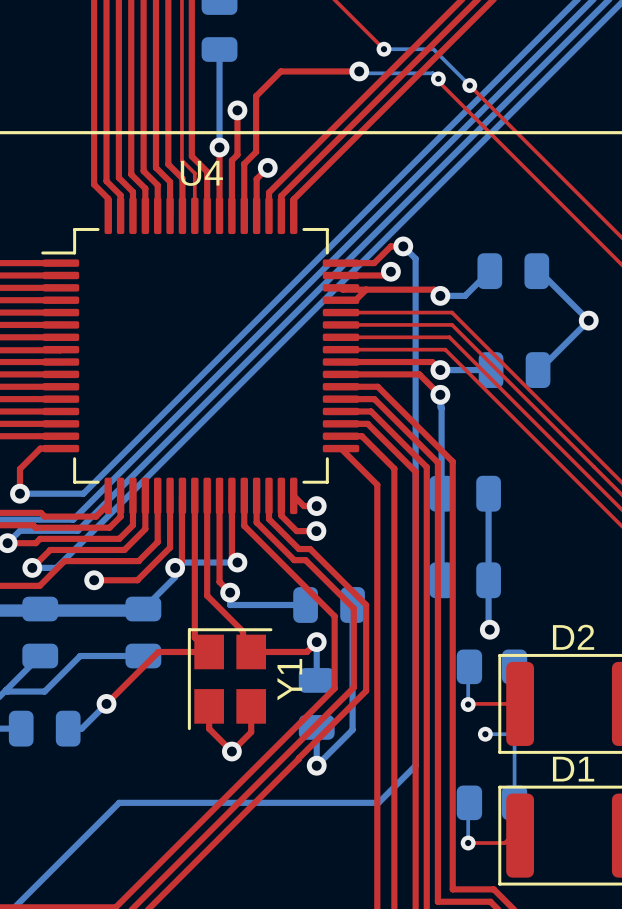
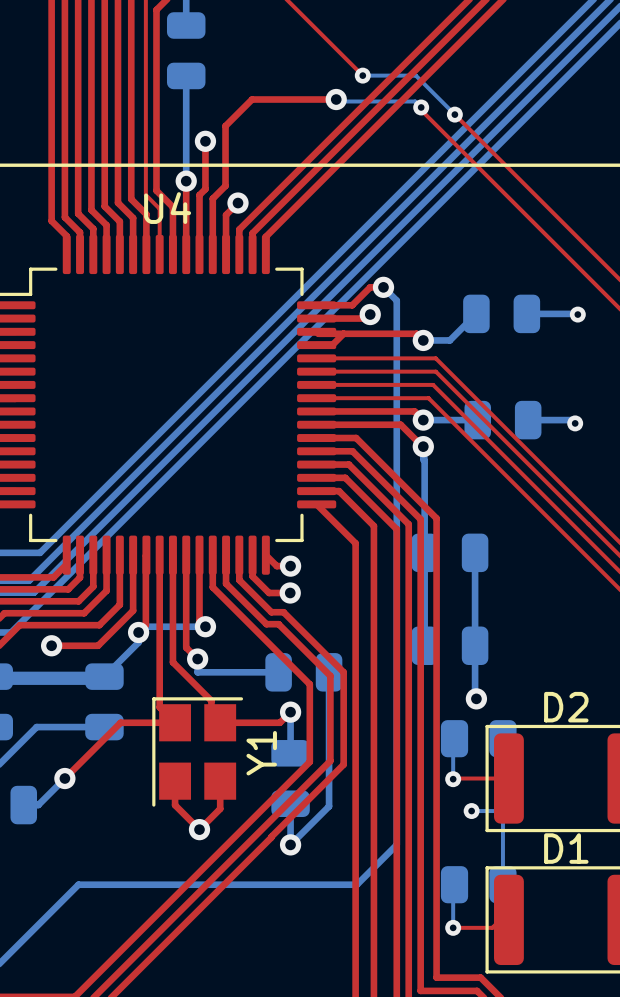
bottom track: (539, 271) (588, 320) (539, 370) -> (529, 313) (577, 314)
via: none -> (577, 314)
via: (588, 320) -> none
bottom track: none -> (529, 420) (571, 420) (575, 423)
via: none -> (575, 423)

